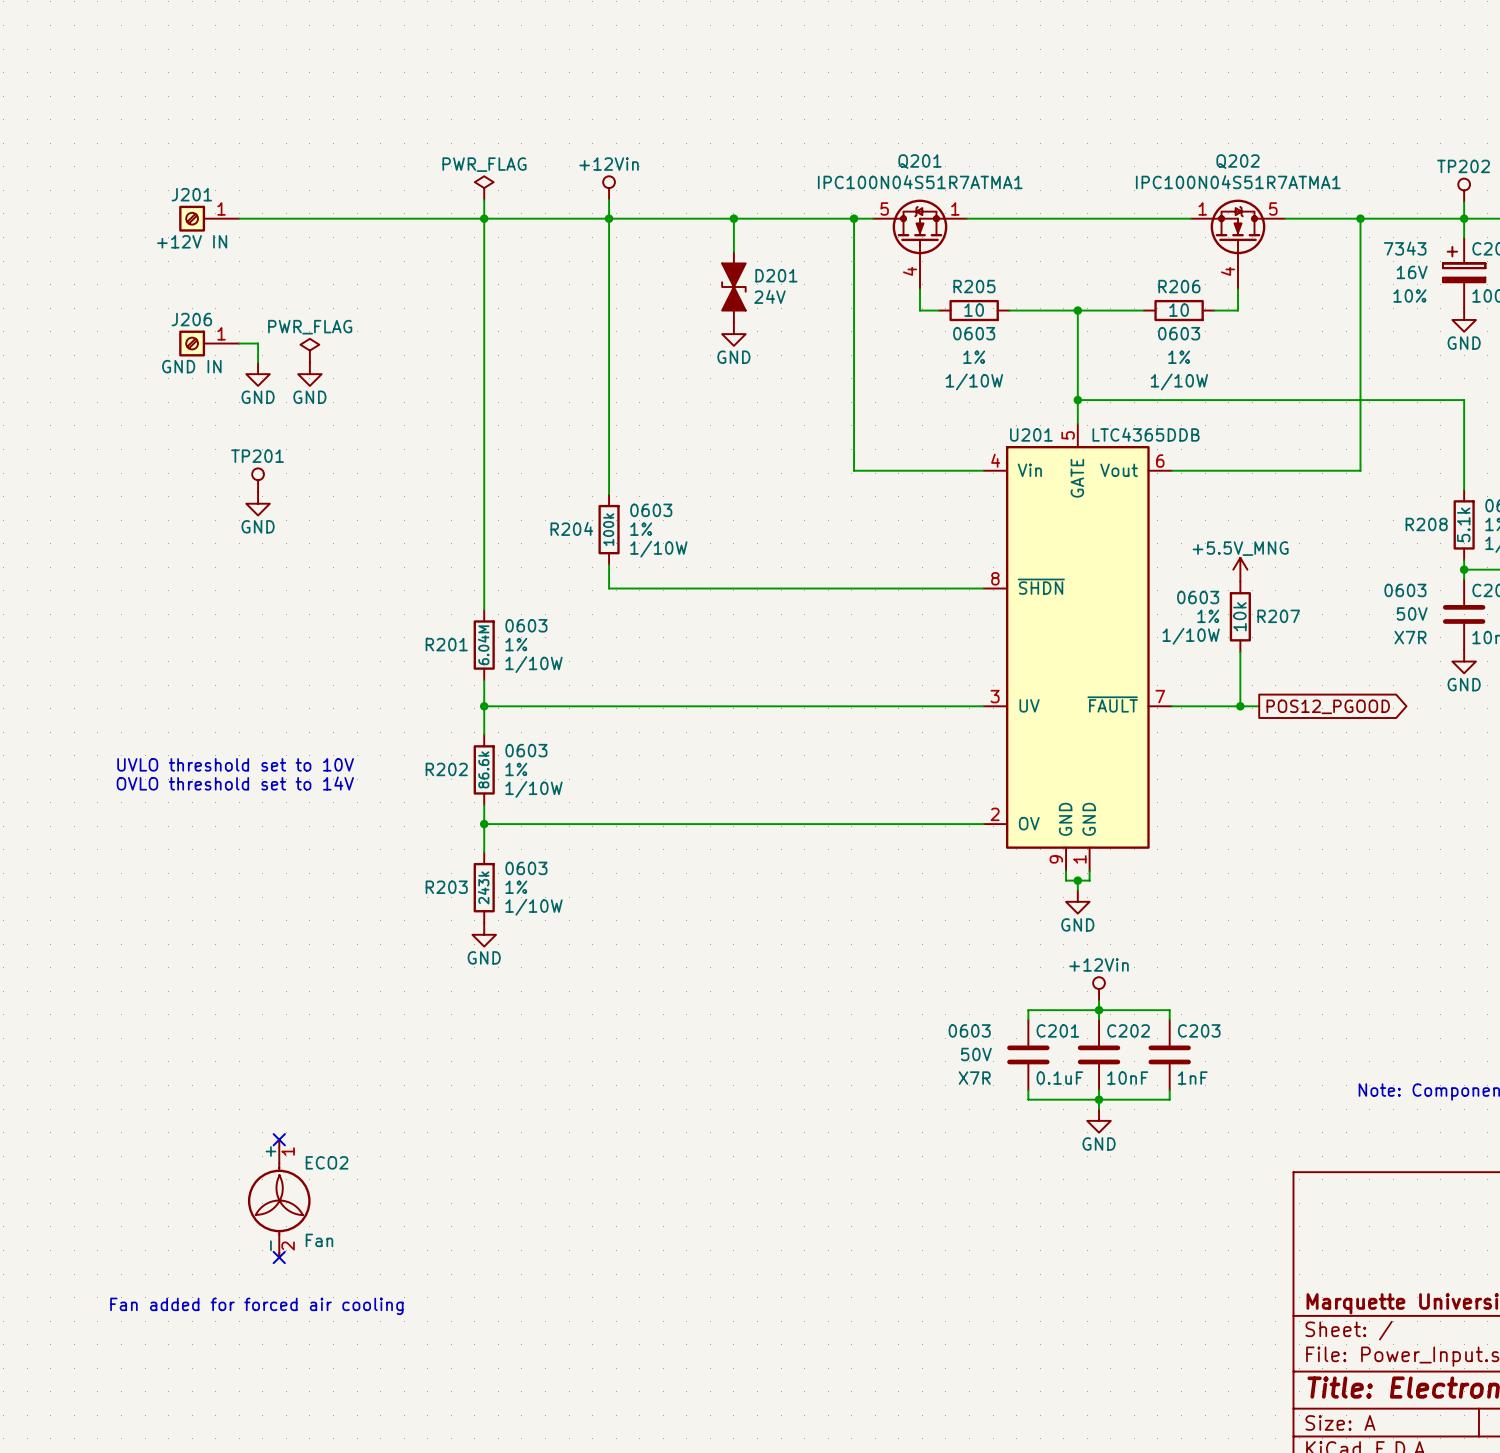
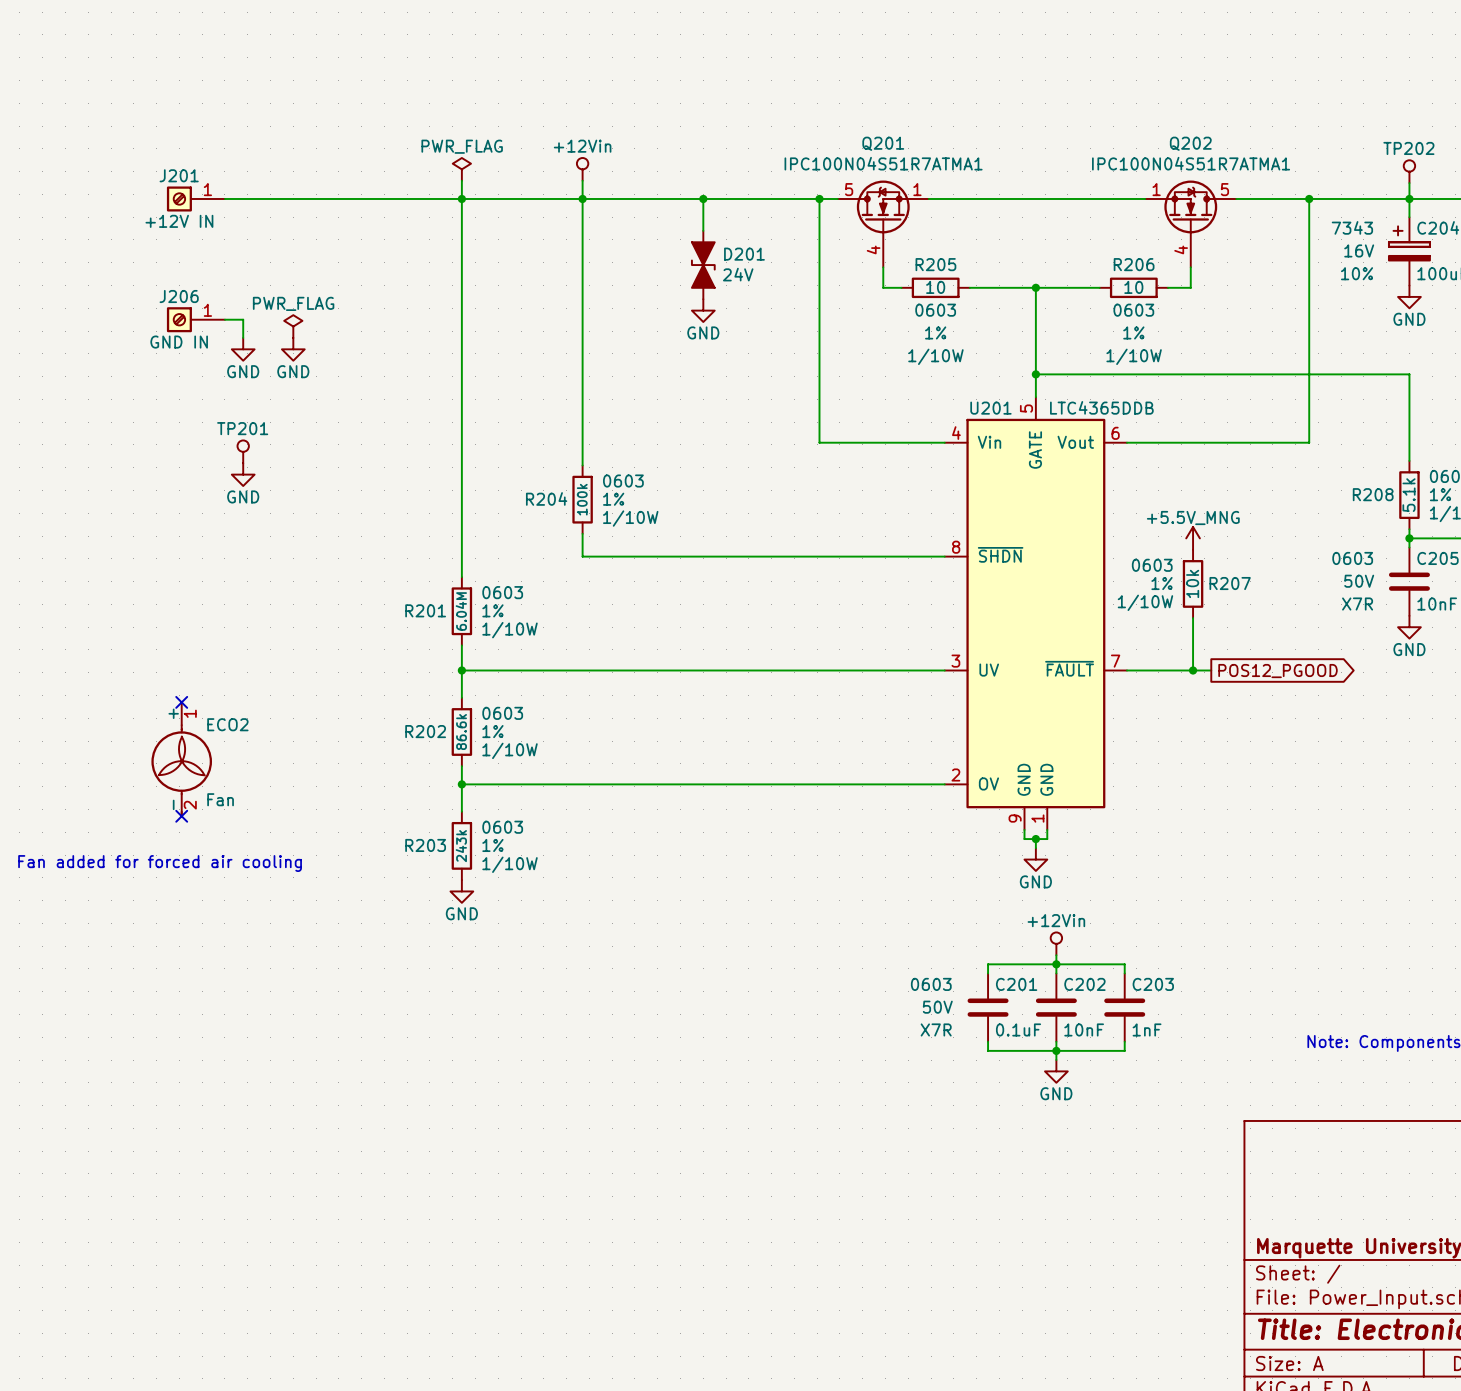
no-connect mark: none -> (181, 702)
text: UVLO threshold set to 10V (235, 764) -> none
text: OVLO threshold set to 14V (235, 783) -> none
no-connect mark: none -> (181, 816)
text: none -> Fan added for forced air cooling (160, 863)
no-connect mark: (279, 1139) -> none
ECO2 position: (279, 1198) -> (181, 759)
no-connect mark: (279, 1257) -> none
text: Fan added for forced air cooling (256, 1306) -> none

